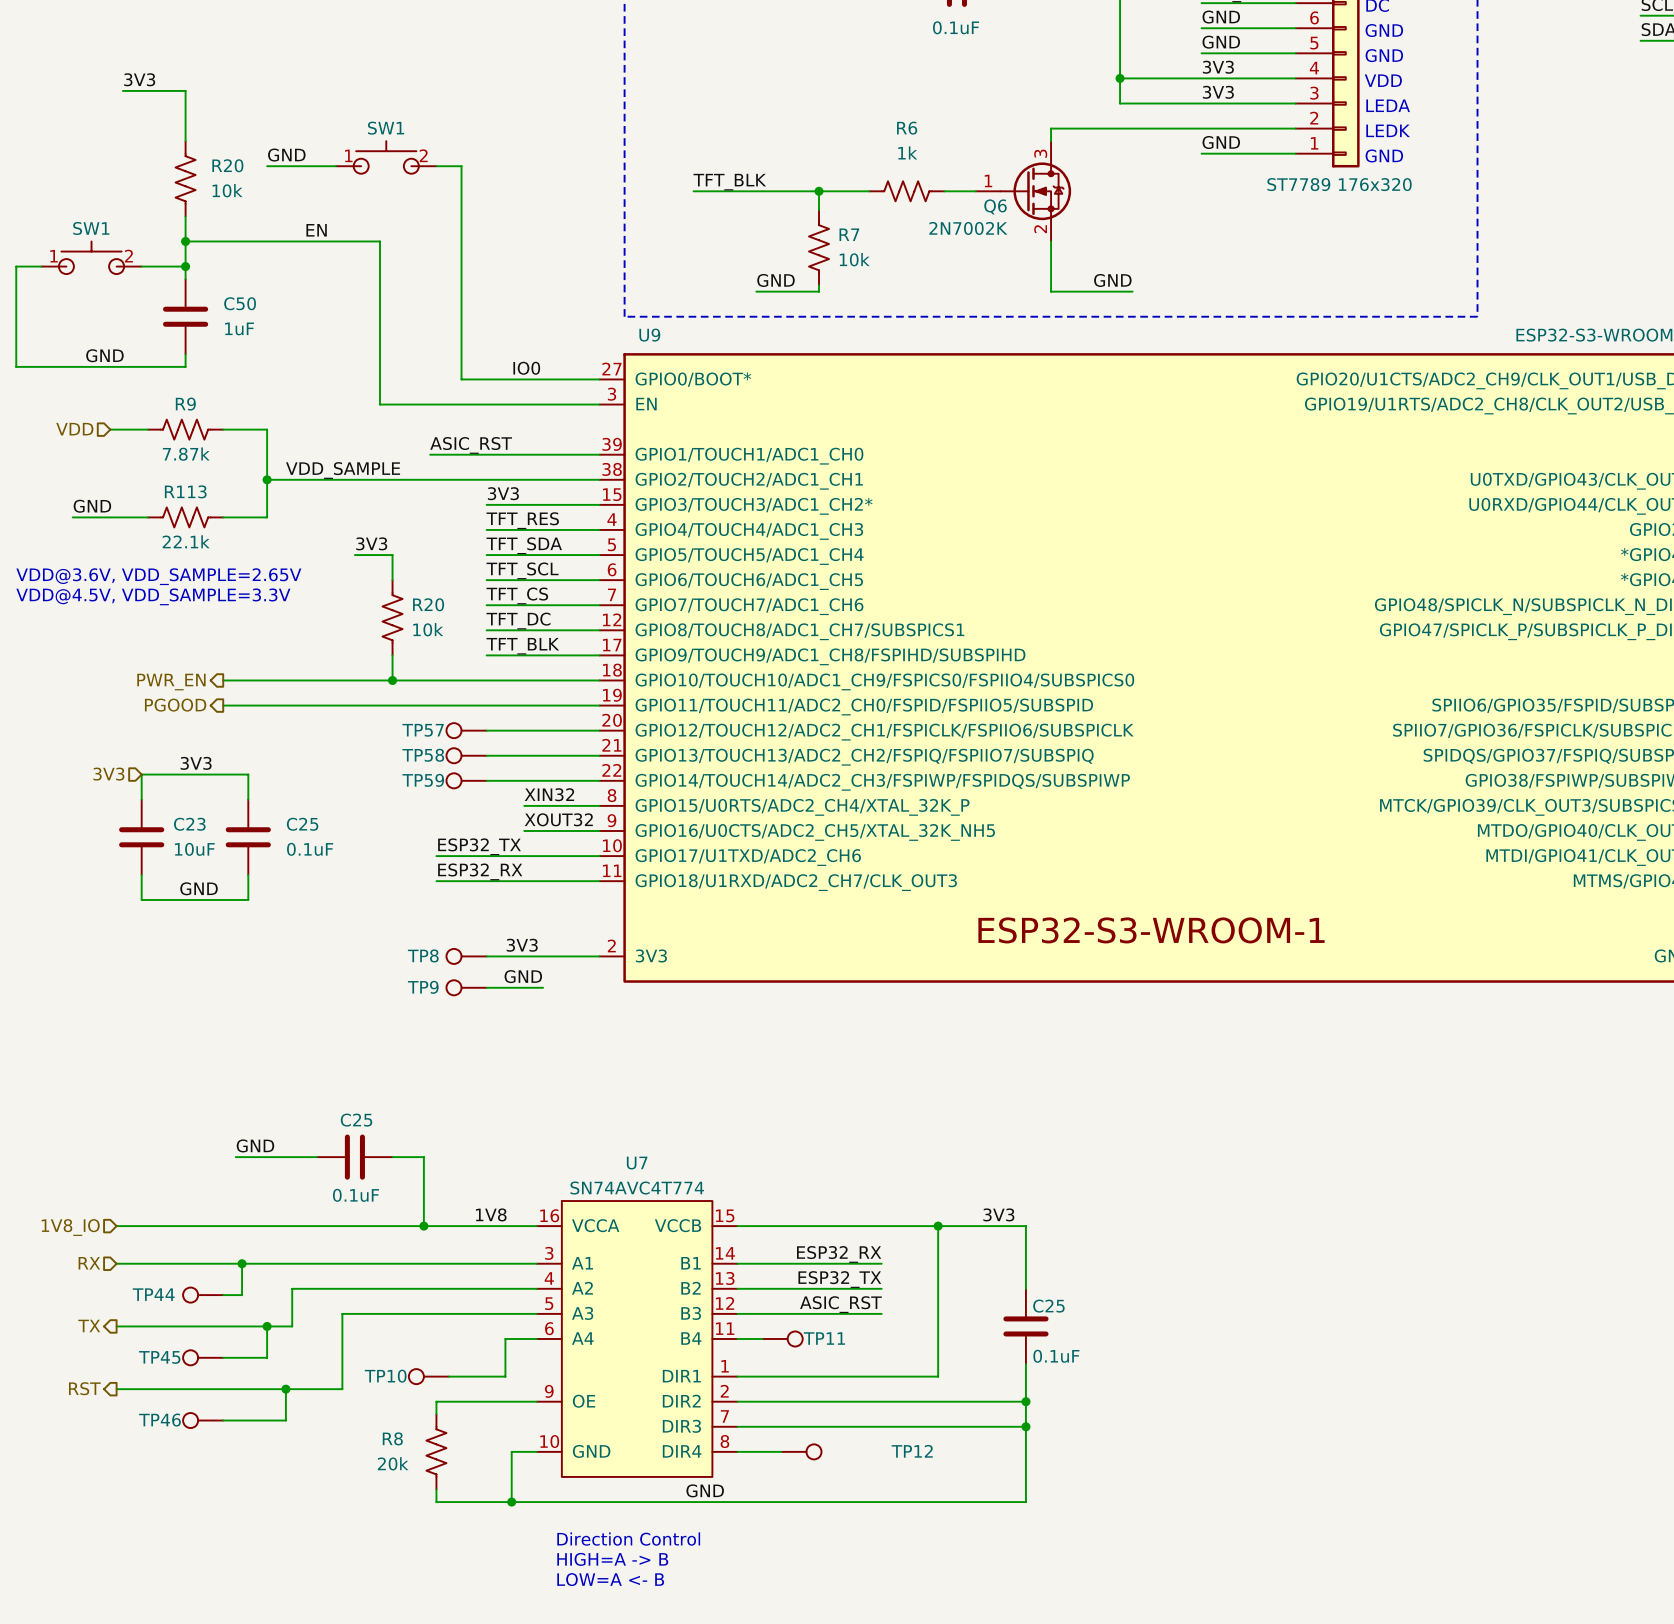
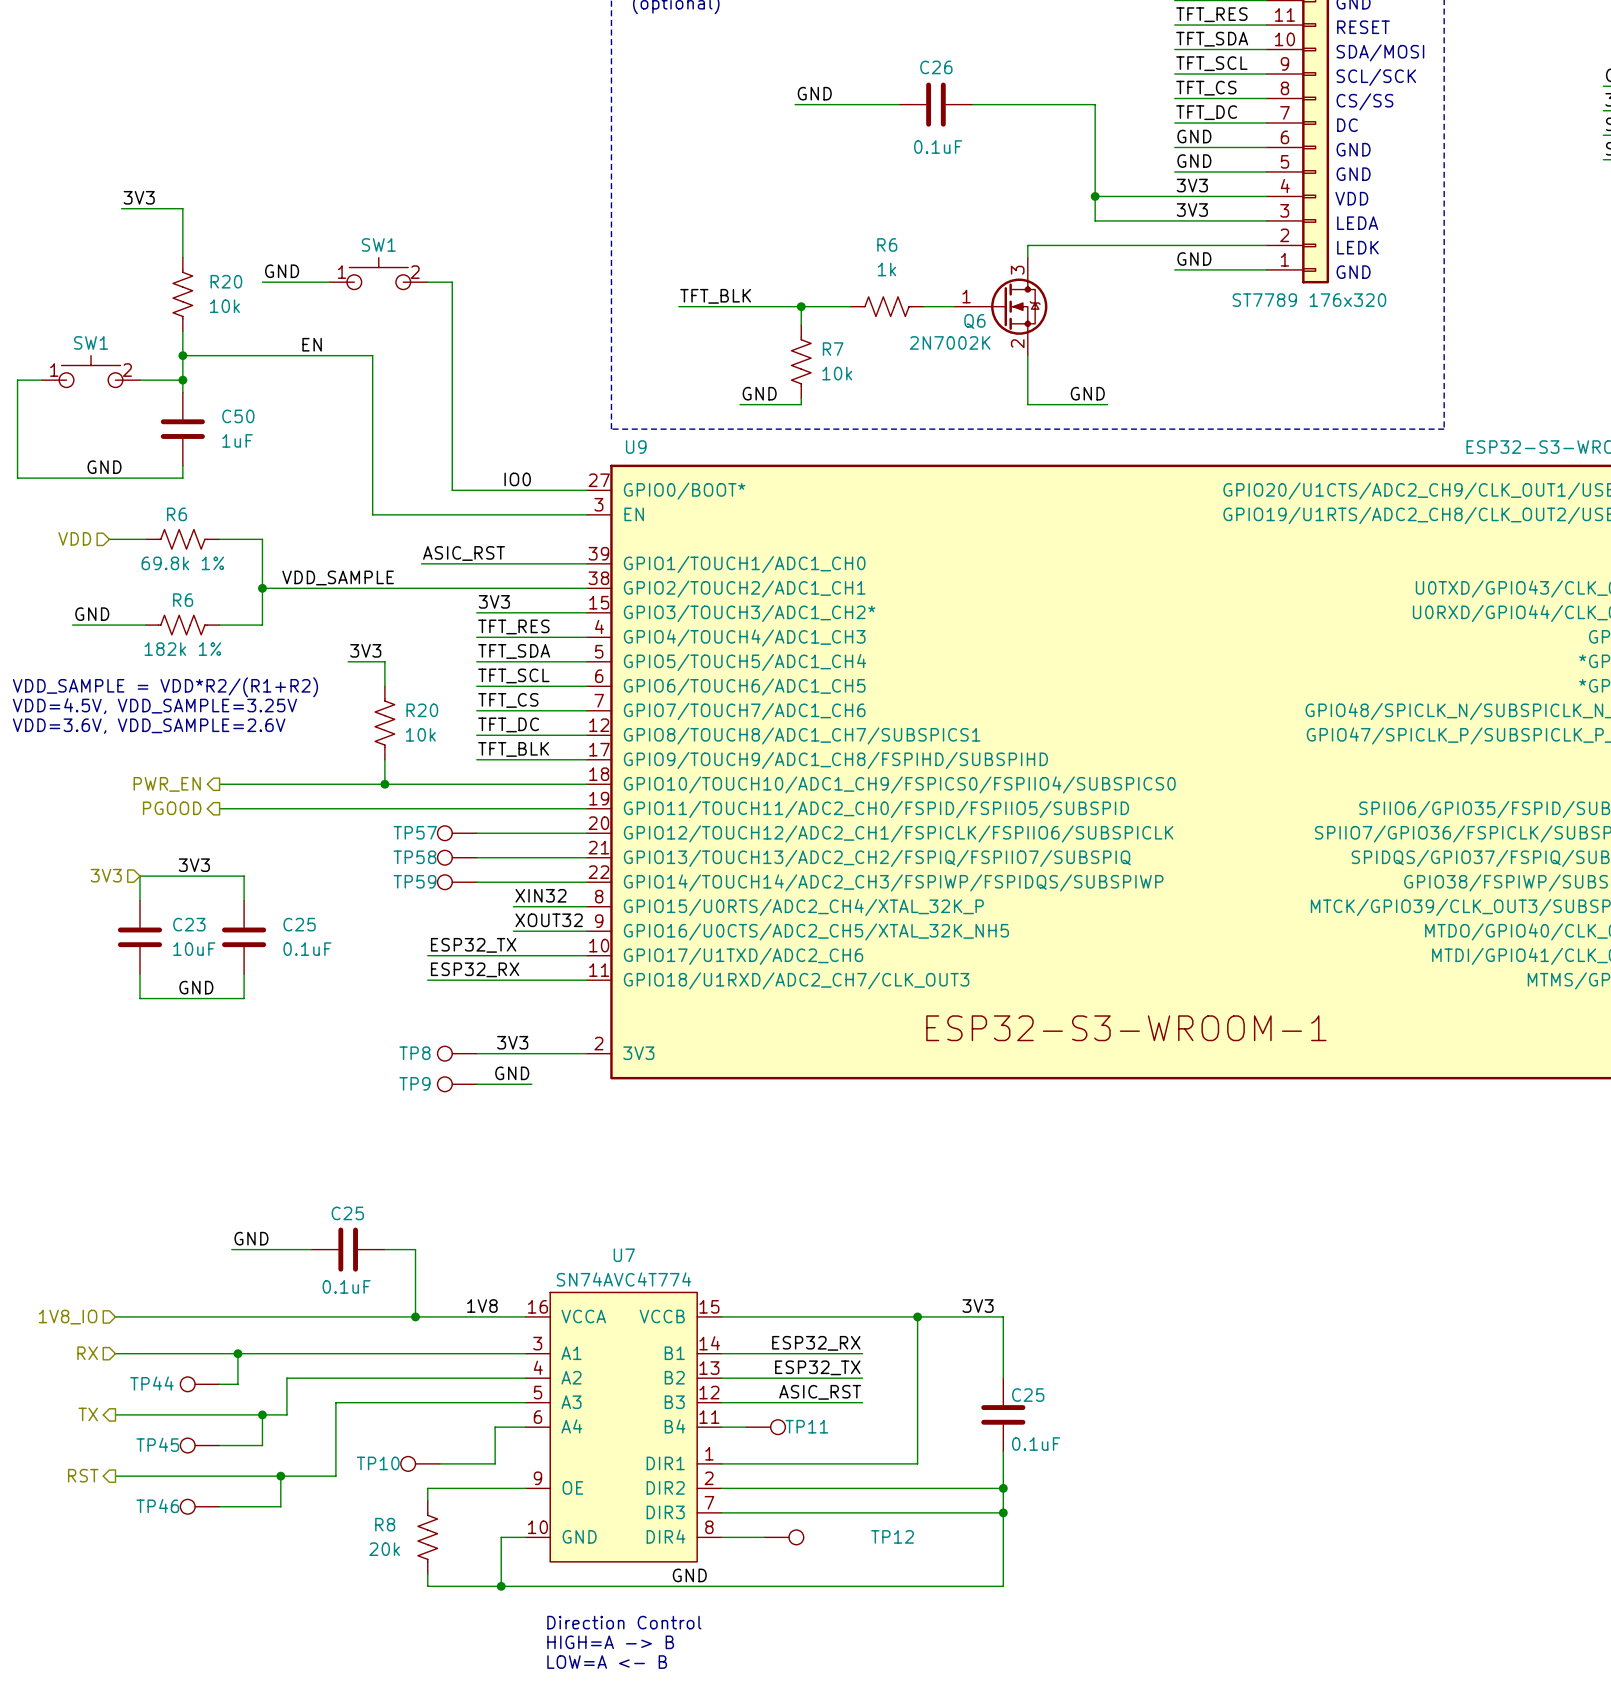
R9 name: R9 (185, 404) -> R6 (177, 514)
R9 value: 7.87k (186, 454) -> 69.8k 1% (182, 563)
R113 name: R113 (185, 491) -> R6 (183, 600)
R113 value: 22.1k (186, 541) -> 182k 1% (182, 649)
text: VDD@3.6V, VDD_SAMPLE=2.65V (158, 576) -> VDD_SAMPLE = VDD*R2/(R1+R2) (165, 687)
text: VDD@4.5V, VDD_SAMPLE=3.3V (153, 596) -> VDD=4.5V, VDD_SAMPLE=3.25V (154, 706)
text: none -> VDD=3.6V, VDD_SAMPLE=2.6V (149, 726)

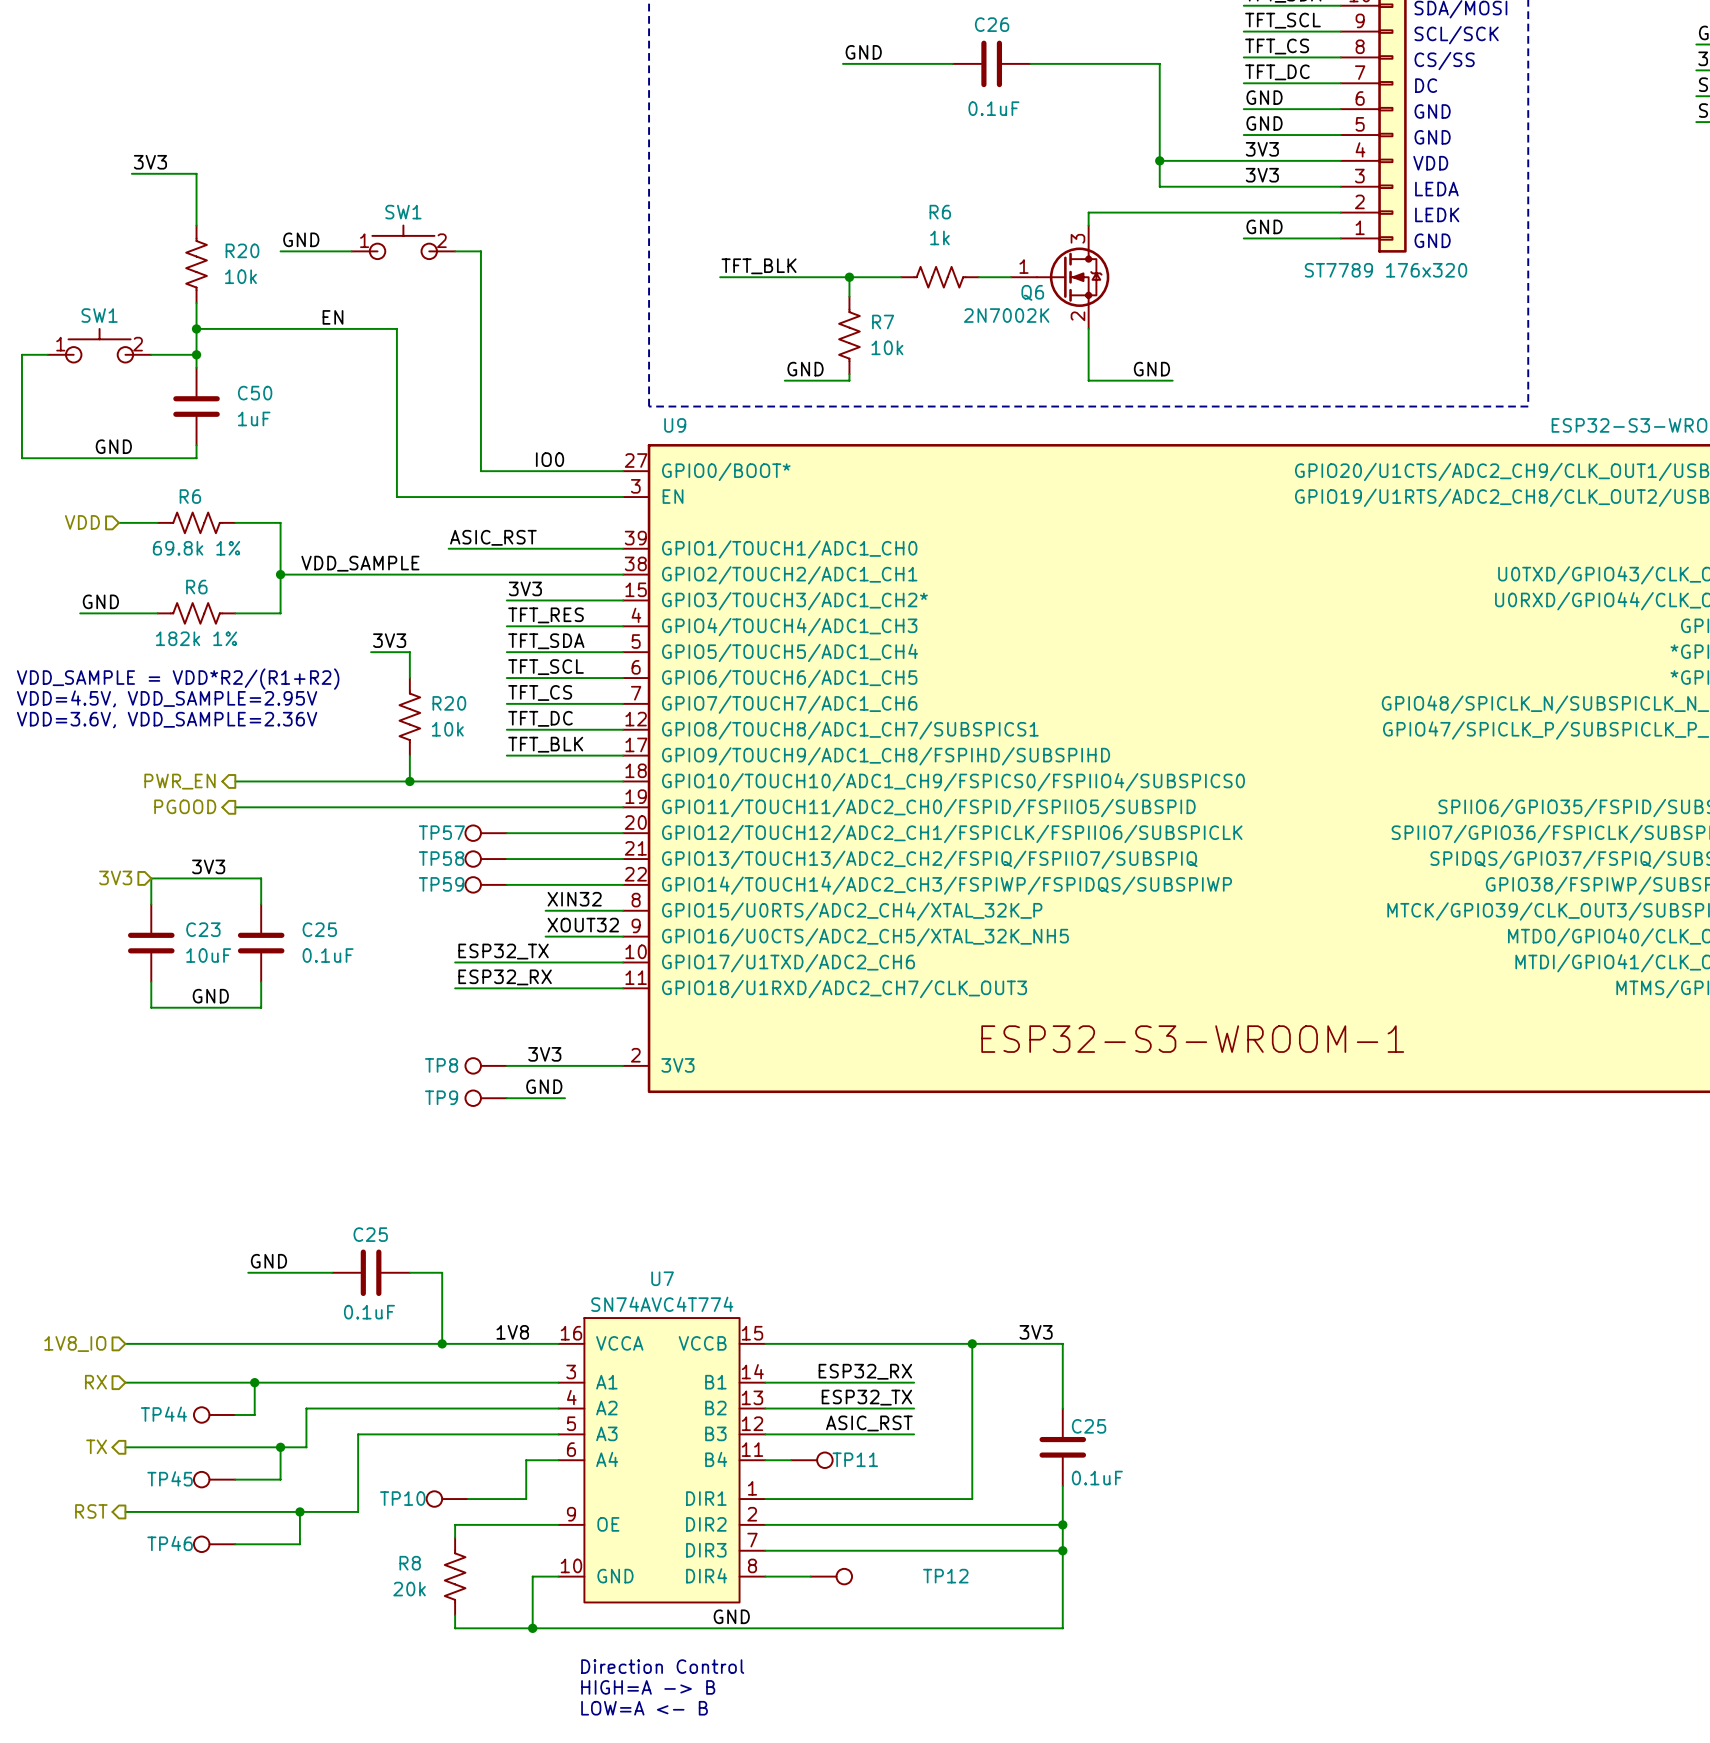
text: VDD=4.5V, VDD_SAMPLE=3.25V (154, 706) -> VDD=4.5V, VDD_SAMPLE=2.95V (167, 698)
text: VDD=3.6V, VDD_SAMPLE=2.6V (149, 726) -> VDD=3.6V, VDD_SAMPLE=2.36V (167, 720)

